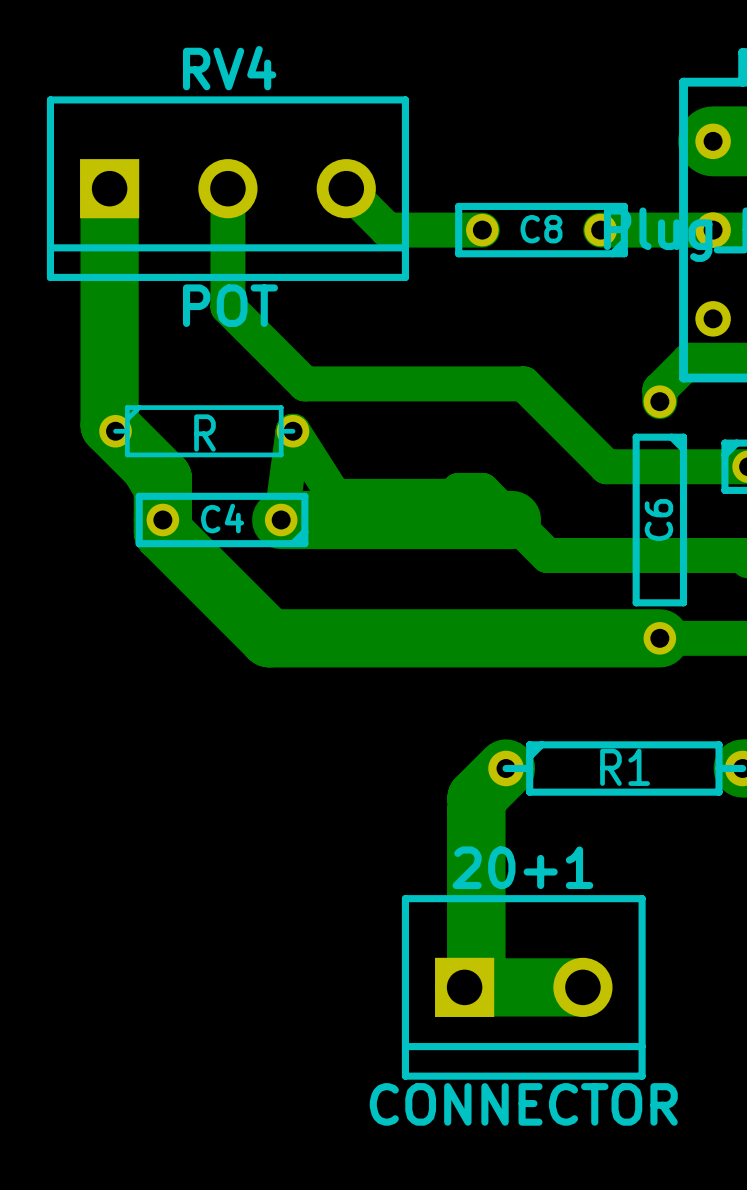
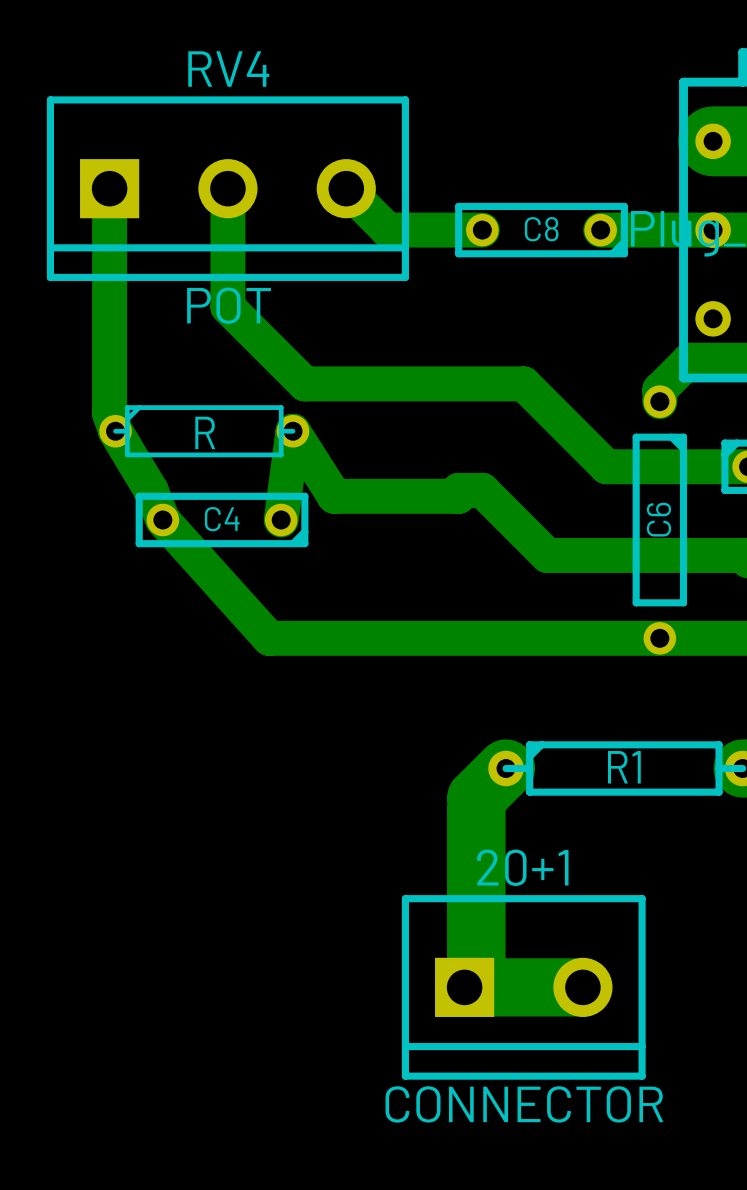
bottom track: (109, 188) (109, 425) (162, 478) (162, 531) (269, 638) (659, 638) -> none
bottom track: none -> (162, 520) (269, 638)
bottom track: (281, 520) (511, 520) -> none

